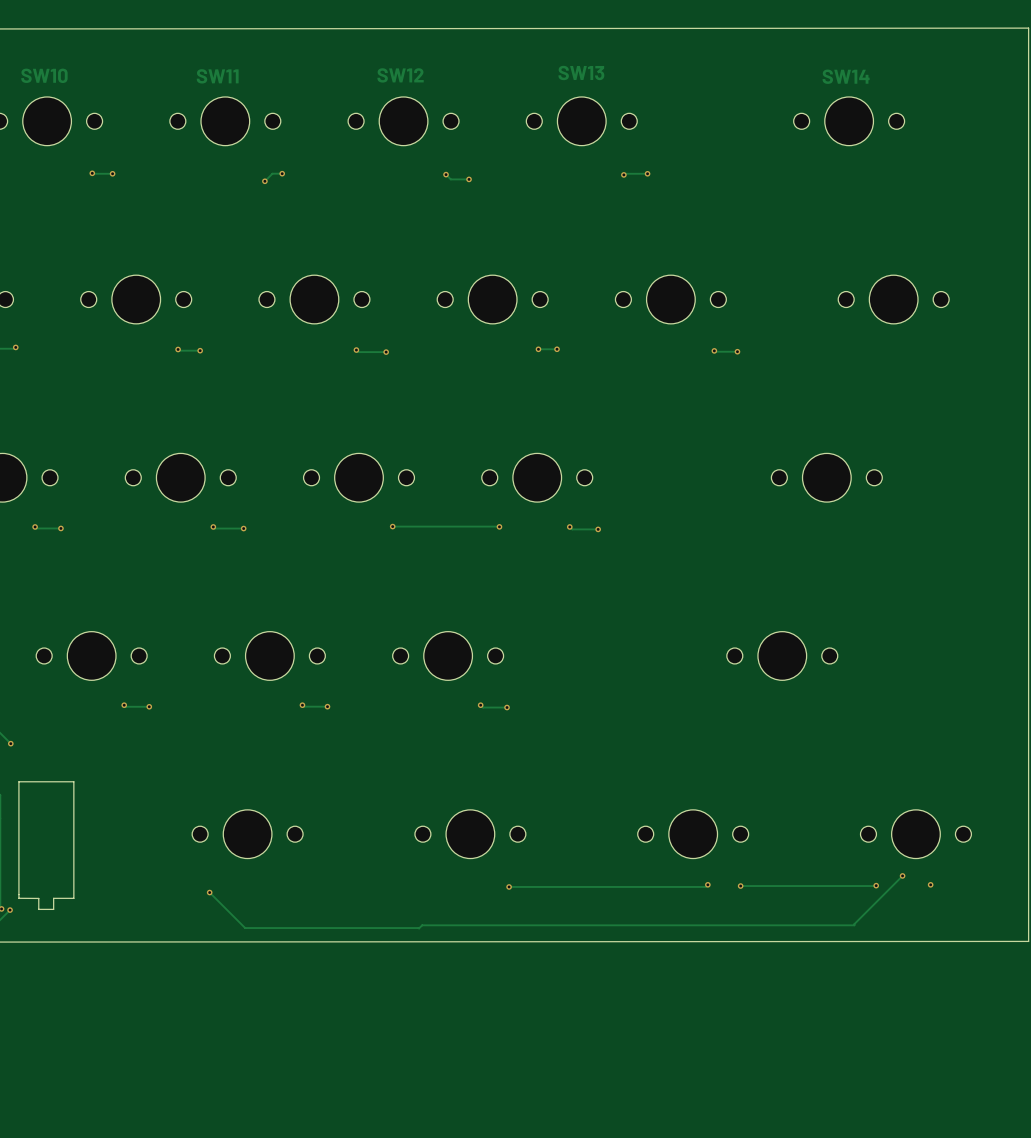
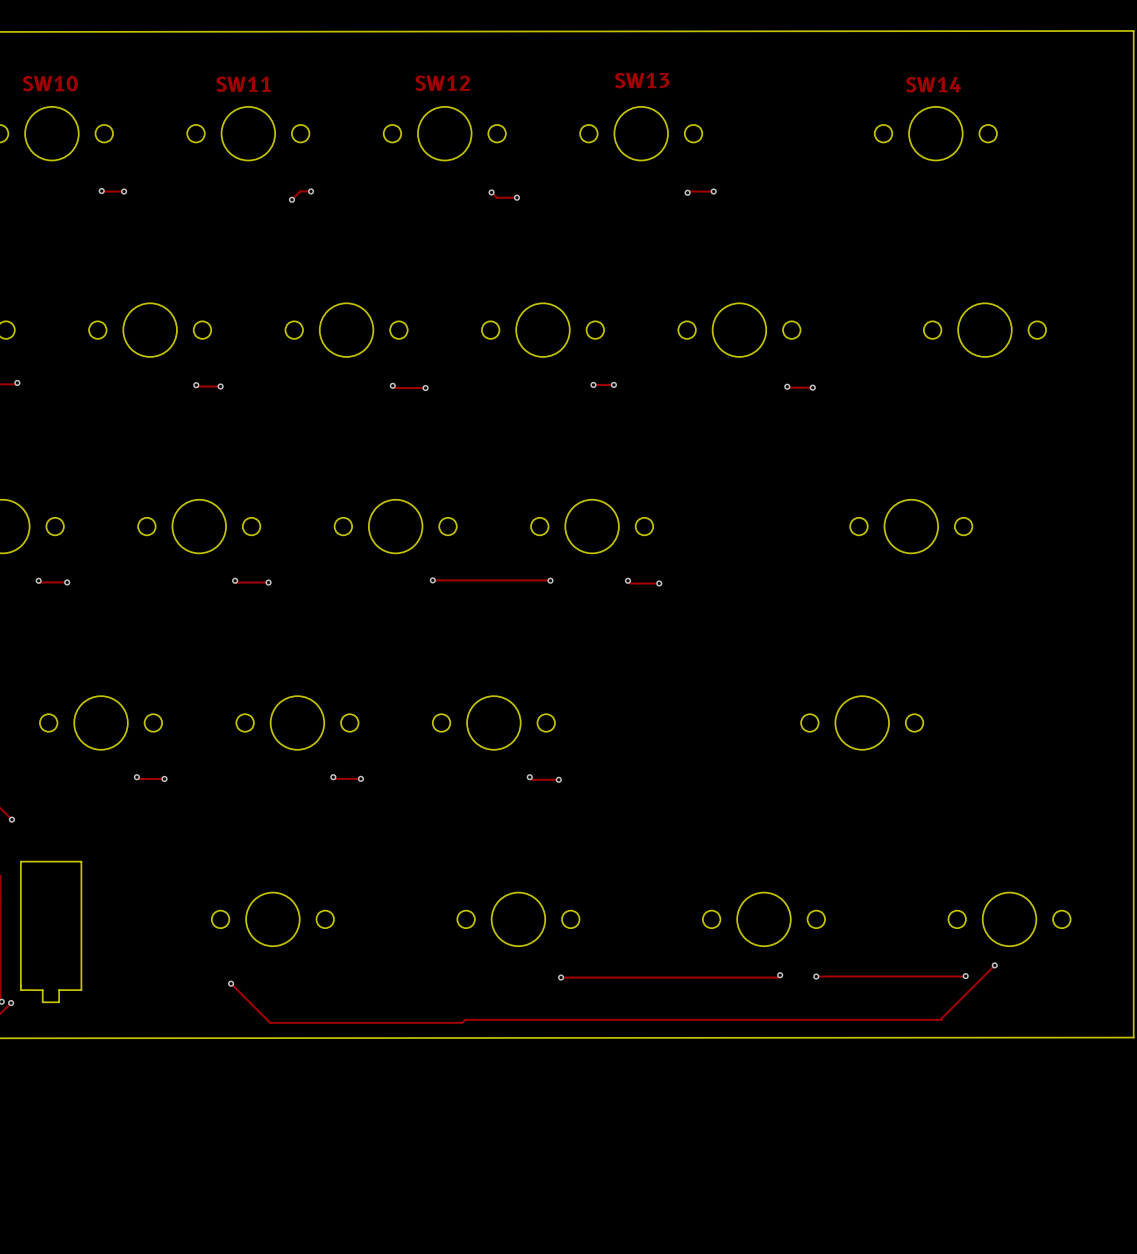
via: (930, 884) -> none

